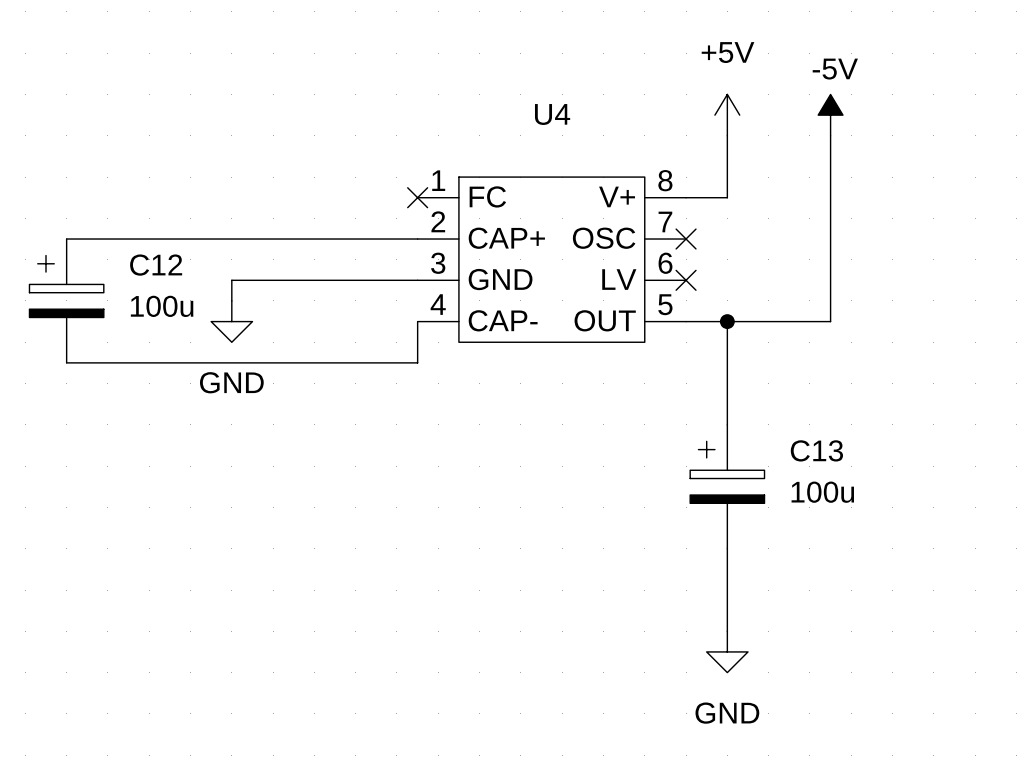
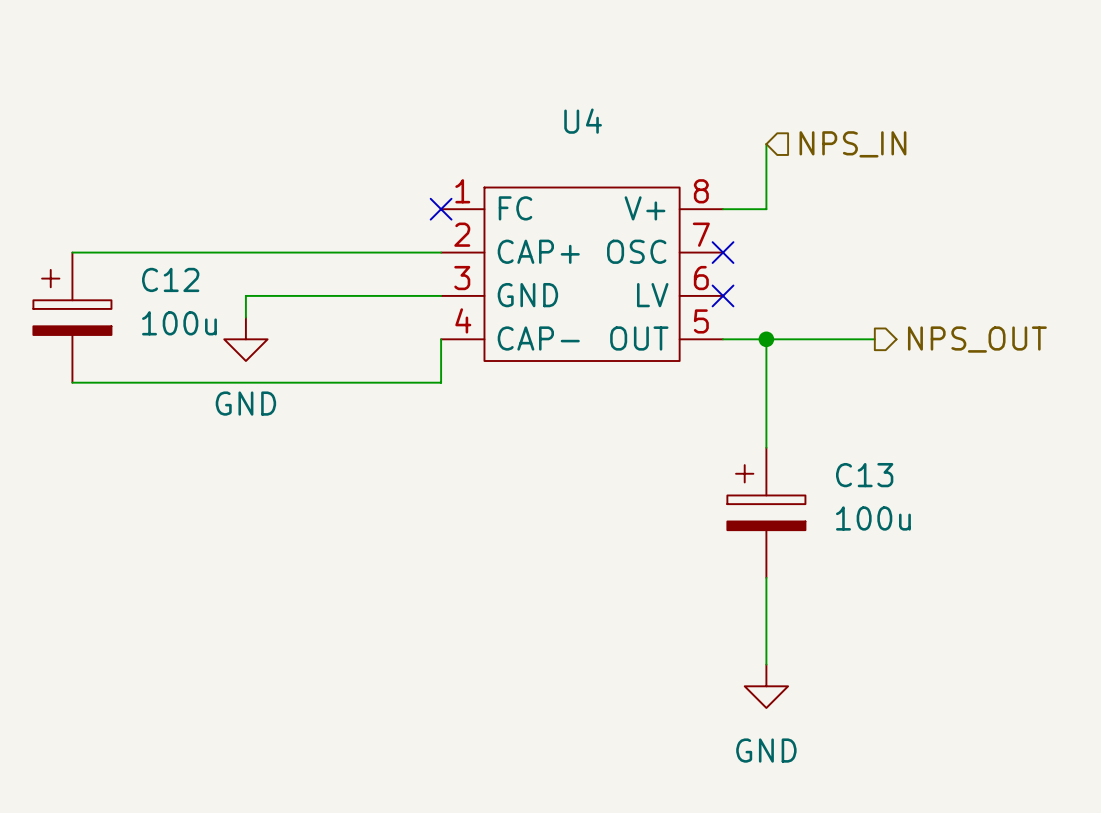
power symbol: +5V (727, 115) -> none
power symbol: -5V (830, 115) -> none
wire: (830, 135) (830, 321) -> none
hierarchical label: none -> NPS_IN (852, 144)
hierarchical label: none -> NPS_OUT (977, 339)

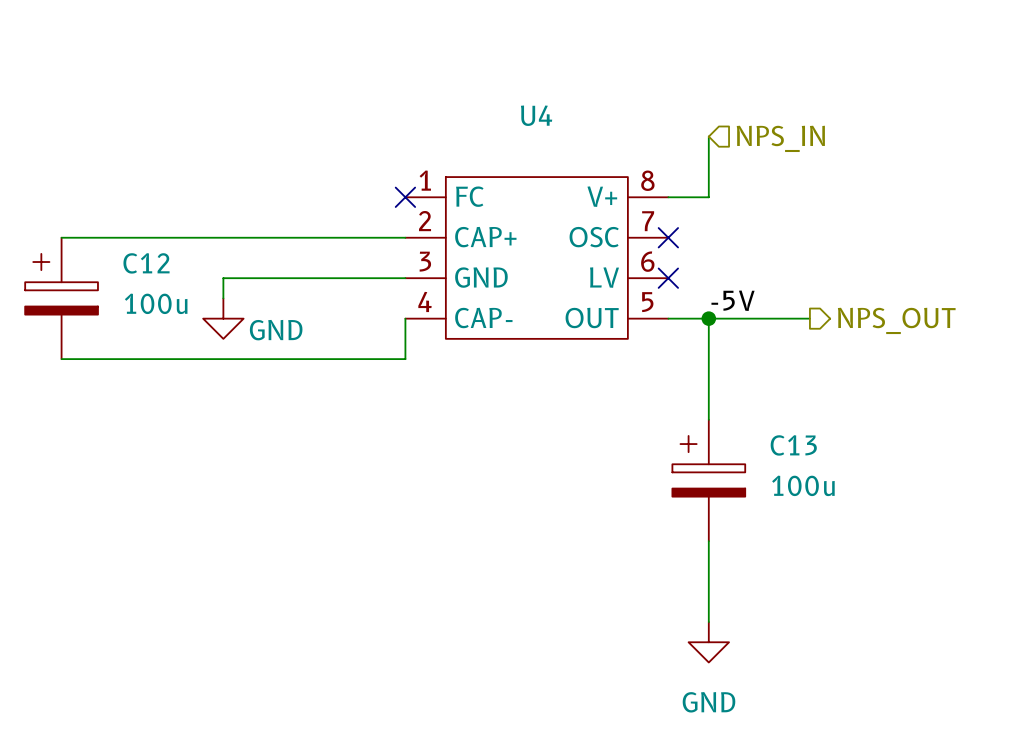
label: none -> -5V (733, 300)
power symbol text position: GND (245, 403) -> GND (276, 330)

